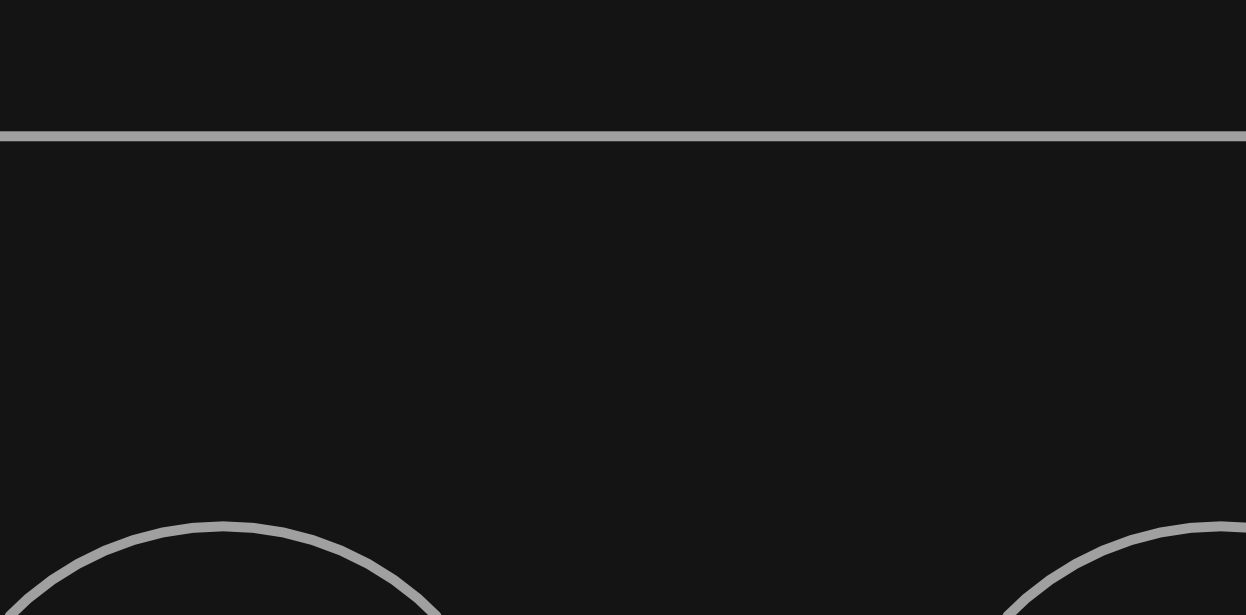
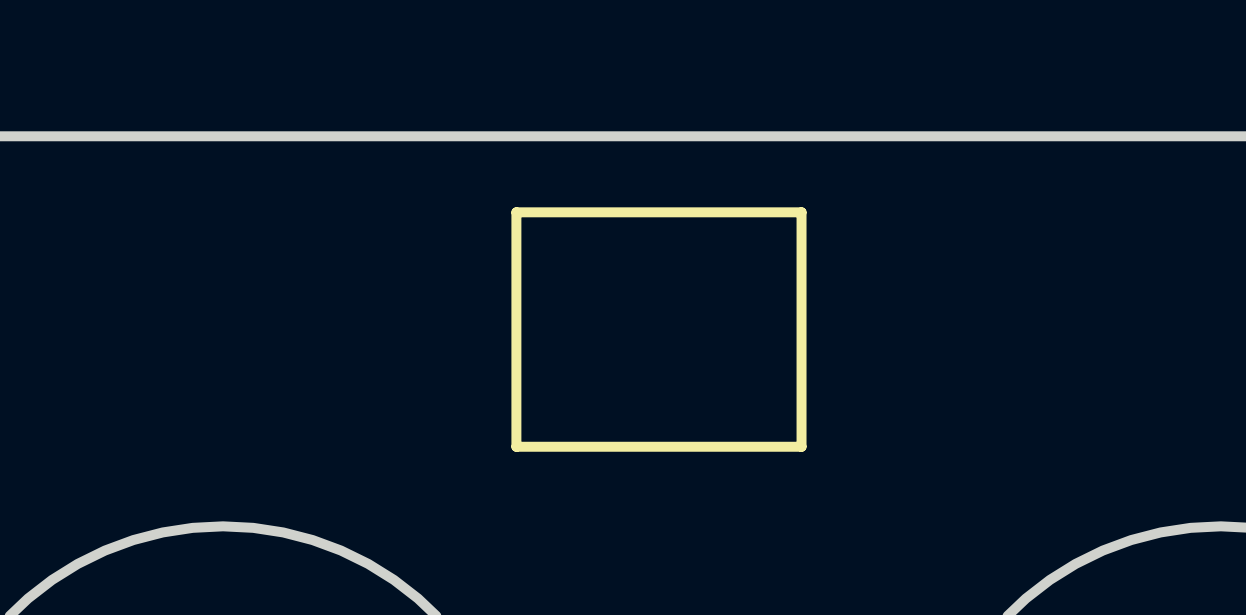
line: none -> (516, 212) (516, 446) (801, 446) (801, 212) (516, 212)

